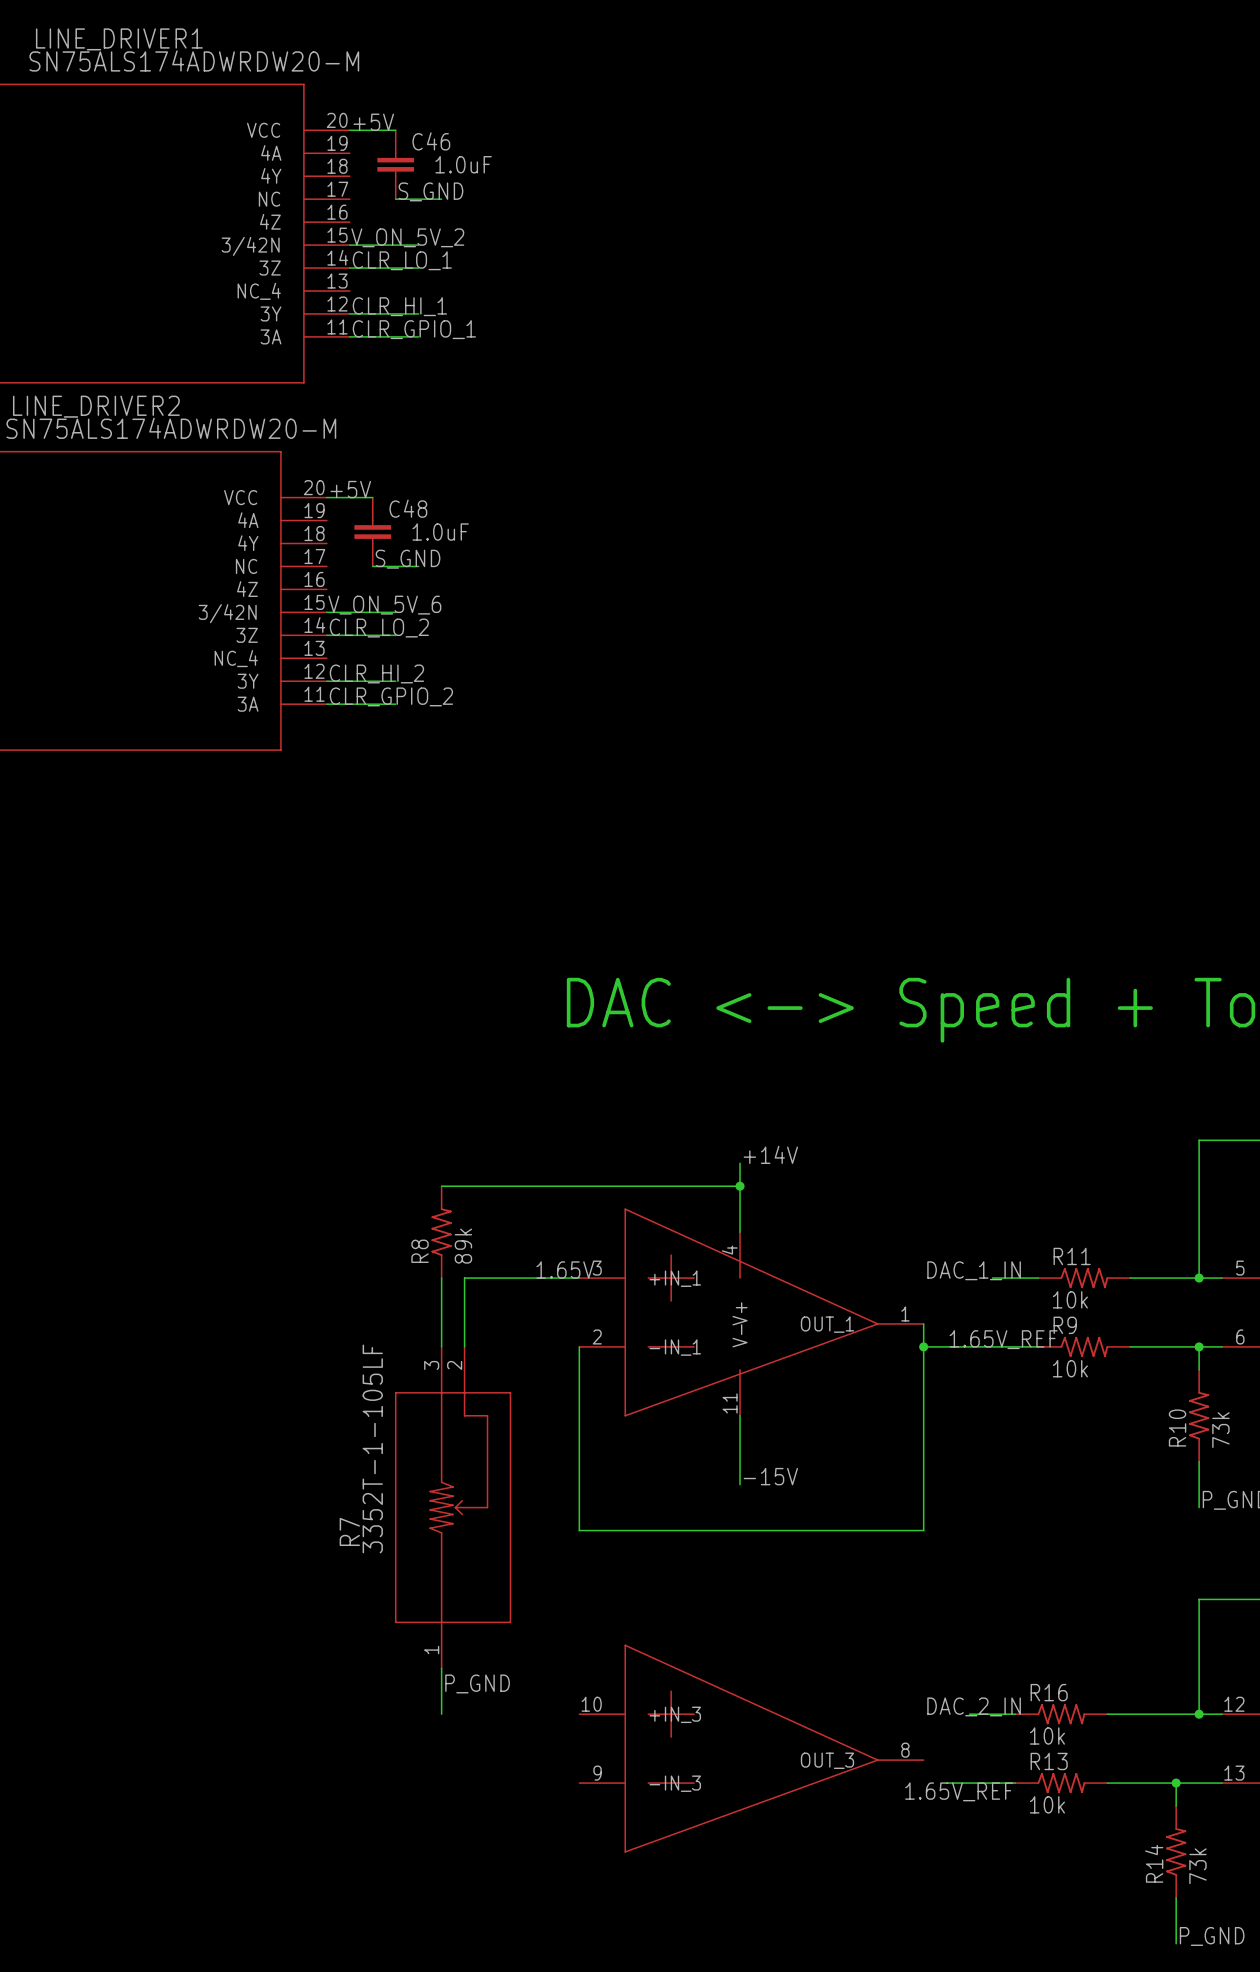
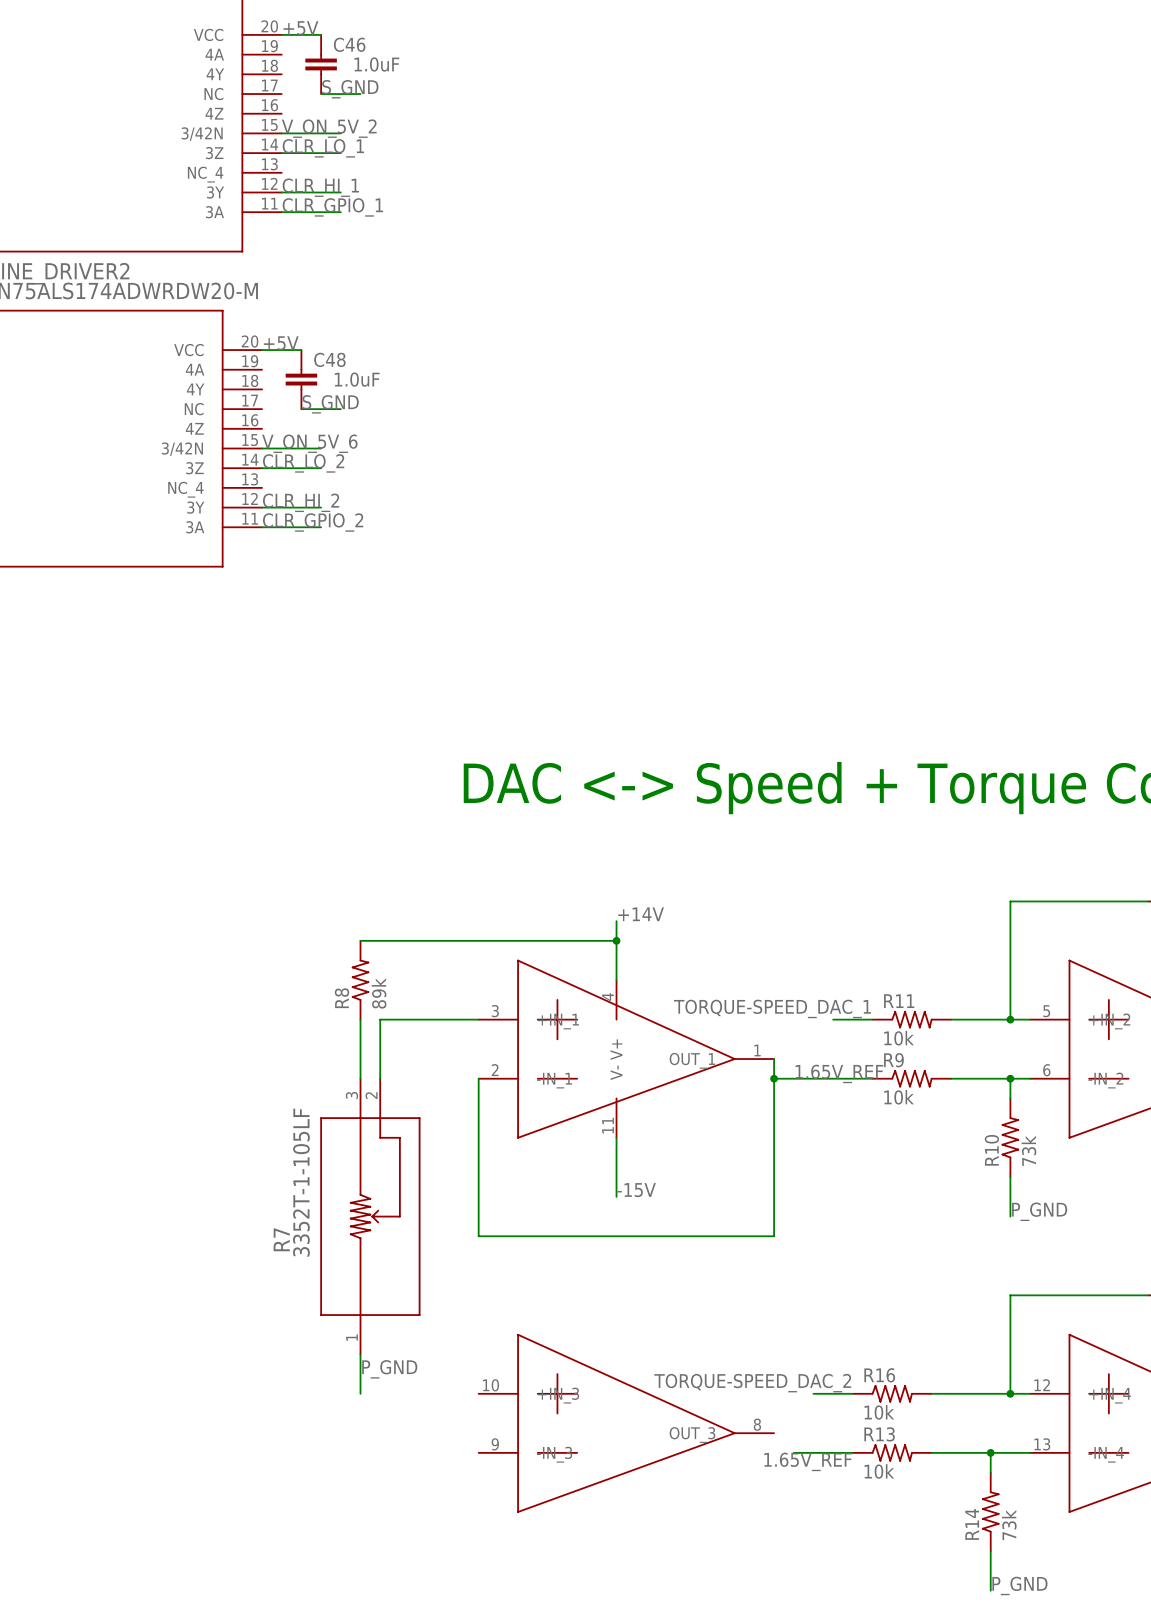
label: none -> TORQUE-SPEED_DAC_1 (772, 1008)
label: 1.65V (565, 1270) -> none
label: DAC_1_IN (974, 1270) -> none
label: none -> TORQUE-SPEED_DAC_2 (752, 1383)
label: DAC_2_IN (974, 1706) -> none

